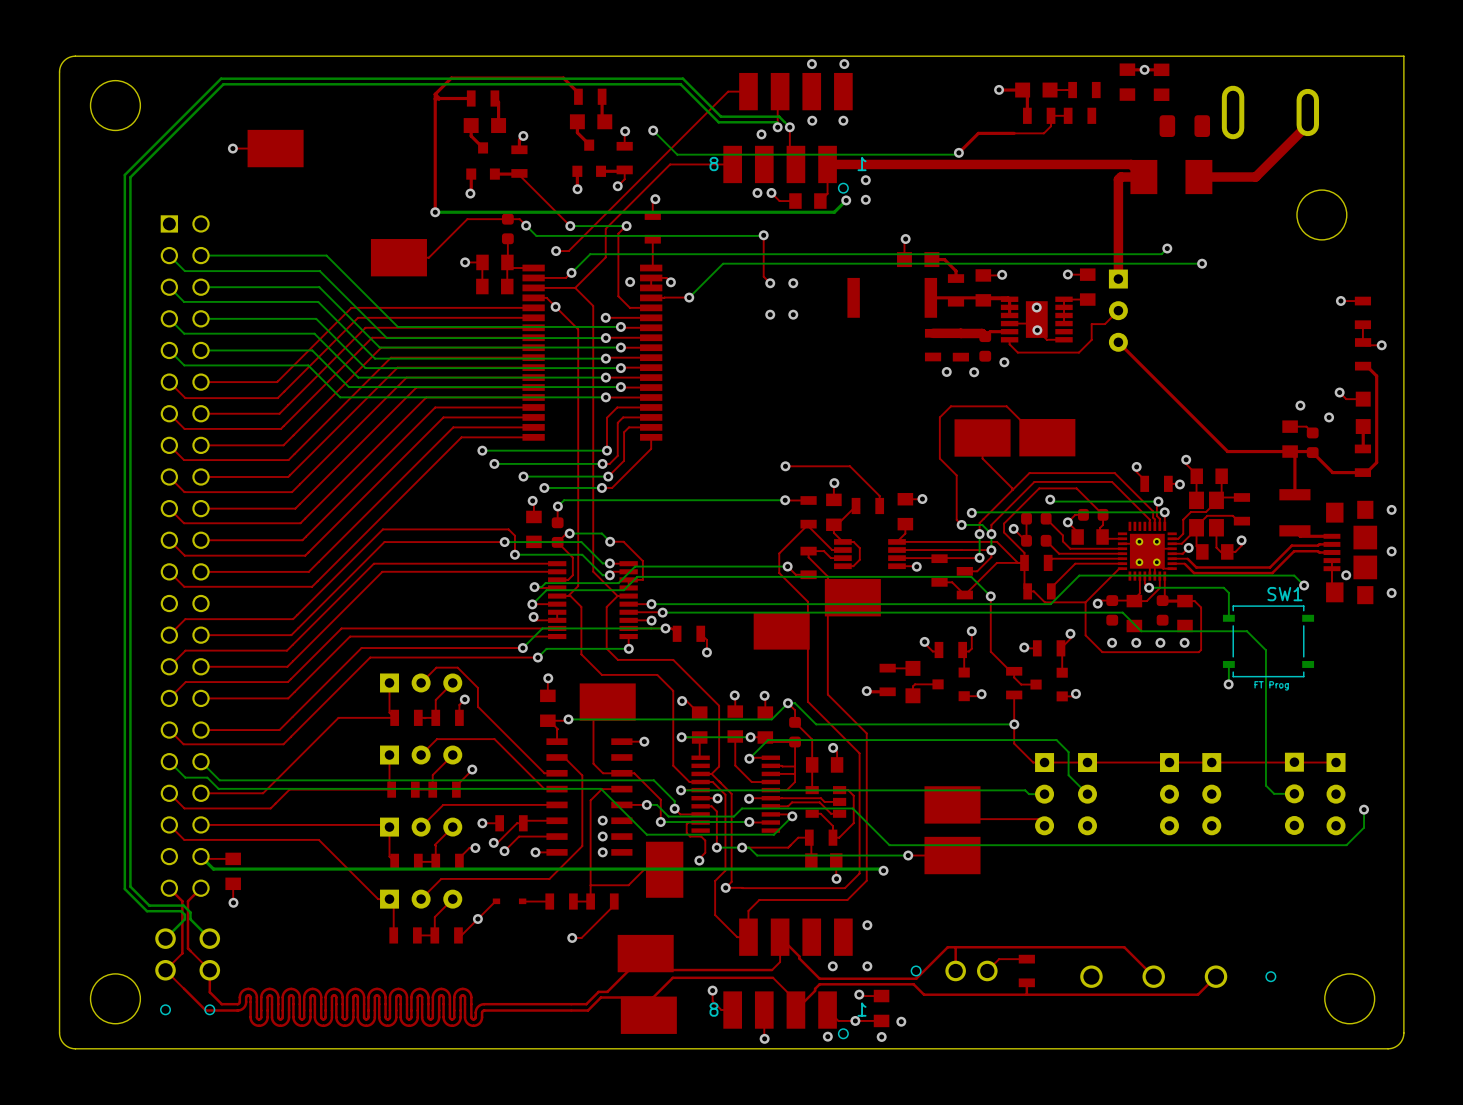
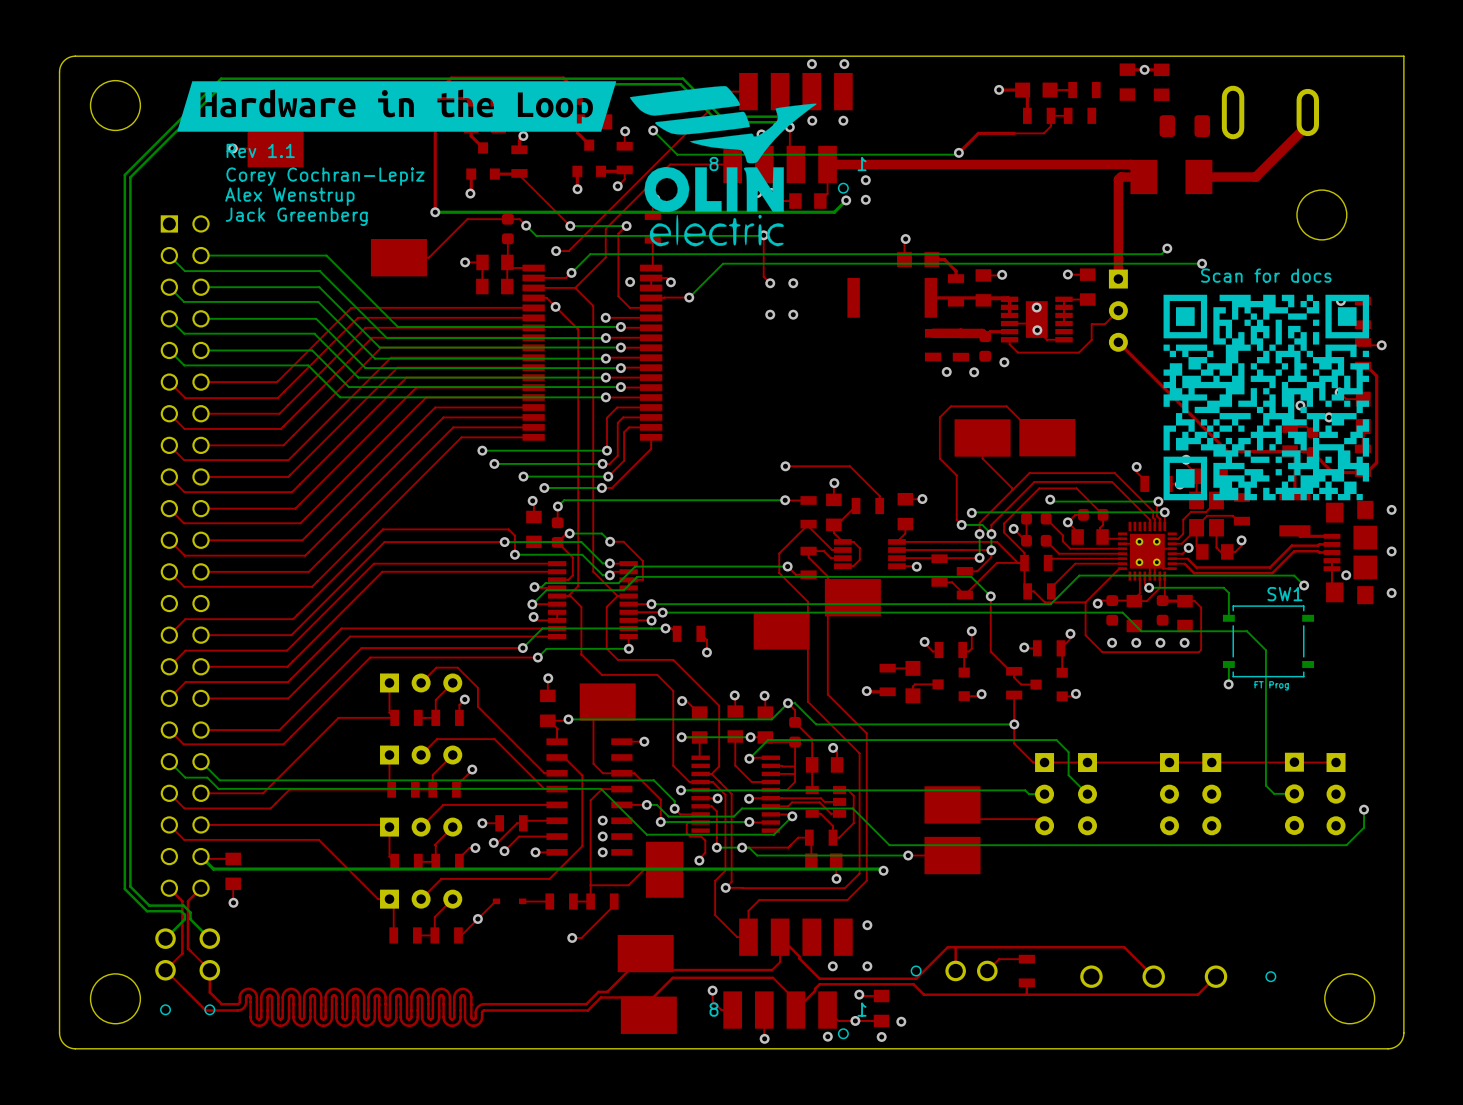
drawing: none -> [177, 81, 817, 247]
text: none -> Rev 1.1 (260, 150)
text: none -> Corey Cochran-Lepiz (325, 176)
text: none -> Alex Wenstrup (289, 196)
text: none -> Jack Greenberg (296, 216)
drawing: none -> [1163, 294, 1370, 501]

